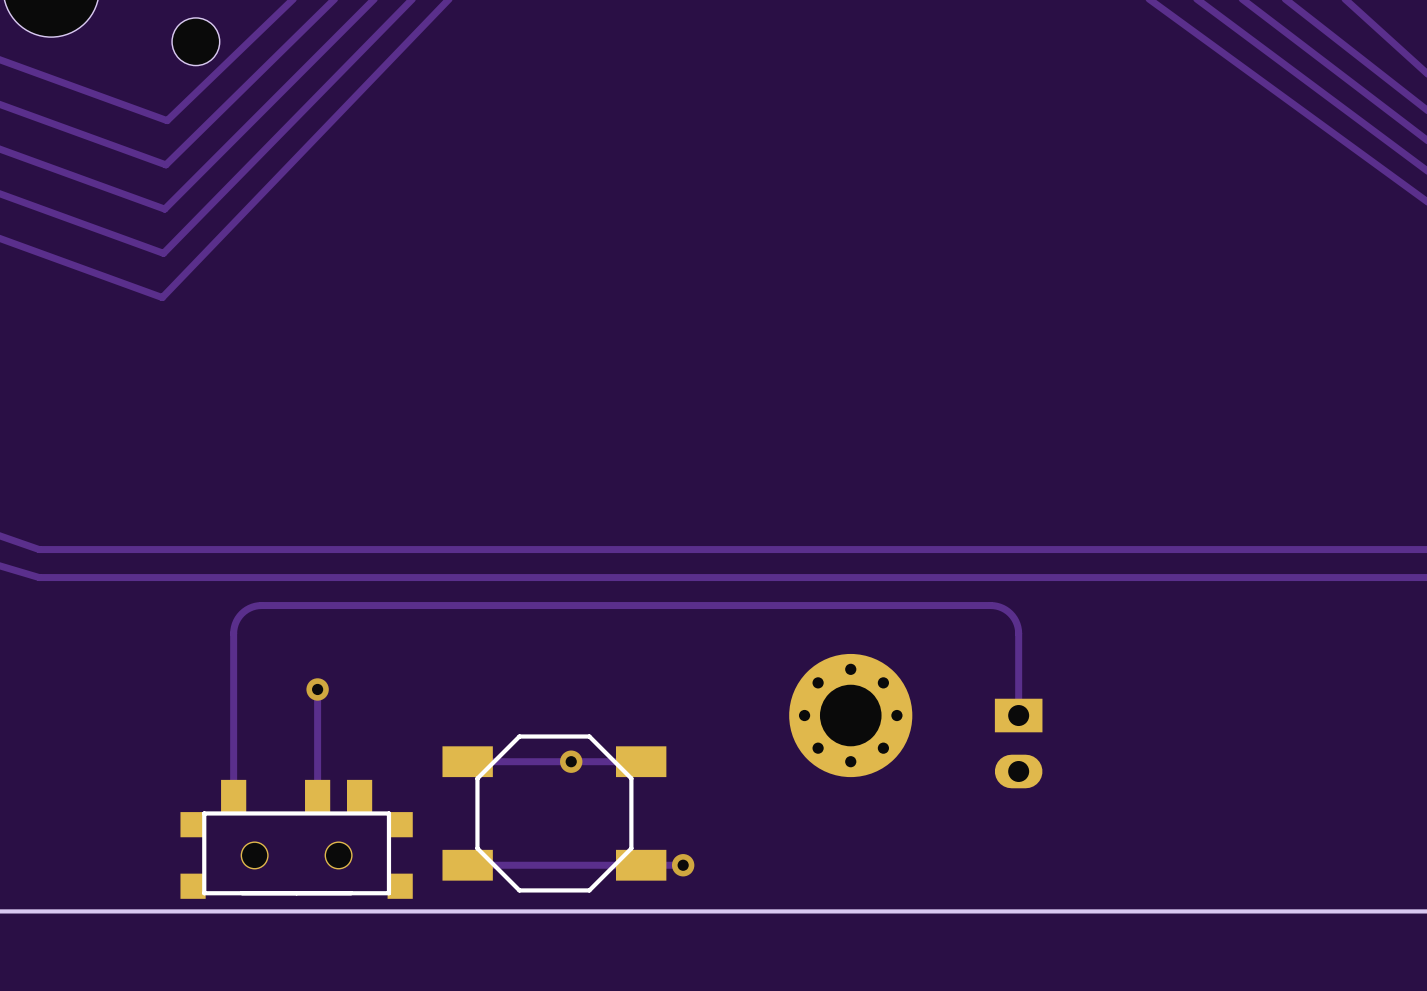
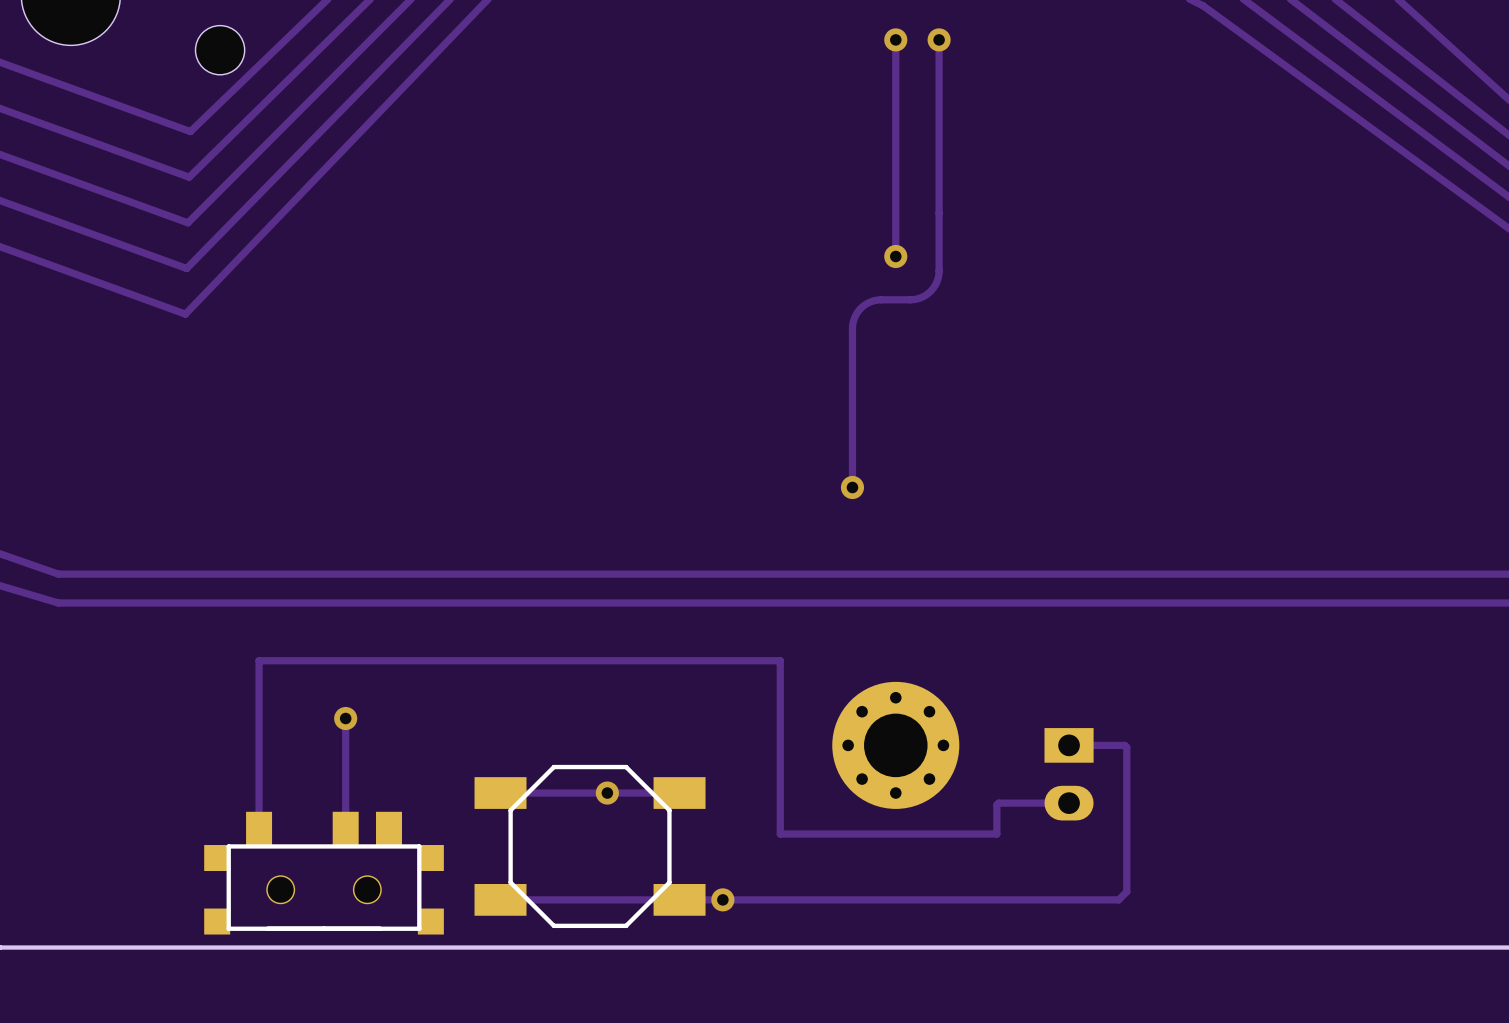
track: none -> (895, 39) (895, 256)
via: none -> (895, 39)
track: none -> (939, 39) (938, 277) (932, 288) (922, 296) (913, 299) (871, 301) (860, 308) (854, 319) (852, 328) (852, 487)
via: none -> (939, 39)
via: none -> (895, 256)
via: none -> (852, 487)
track: (233, 633) (236, 621) (241, 613) (252, 607) (261, 605) (993, 605) (1002, 608) (1010, 613) (1017, 627) (1018, 715) -> (259, 660) (780, 660) (780, 834) (996, 834) (996, 805) (998, 803) (1069, 803)
track: none -> (1069, 745) (1124, 745) (1126, 747) (1126, 891) (1118, 899) (722, 899)

